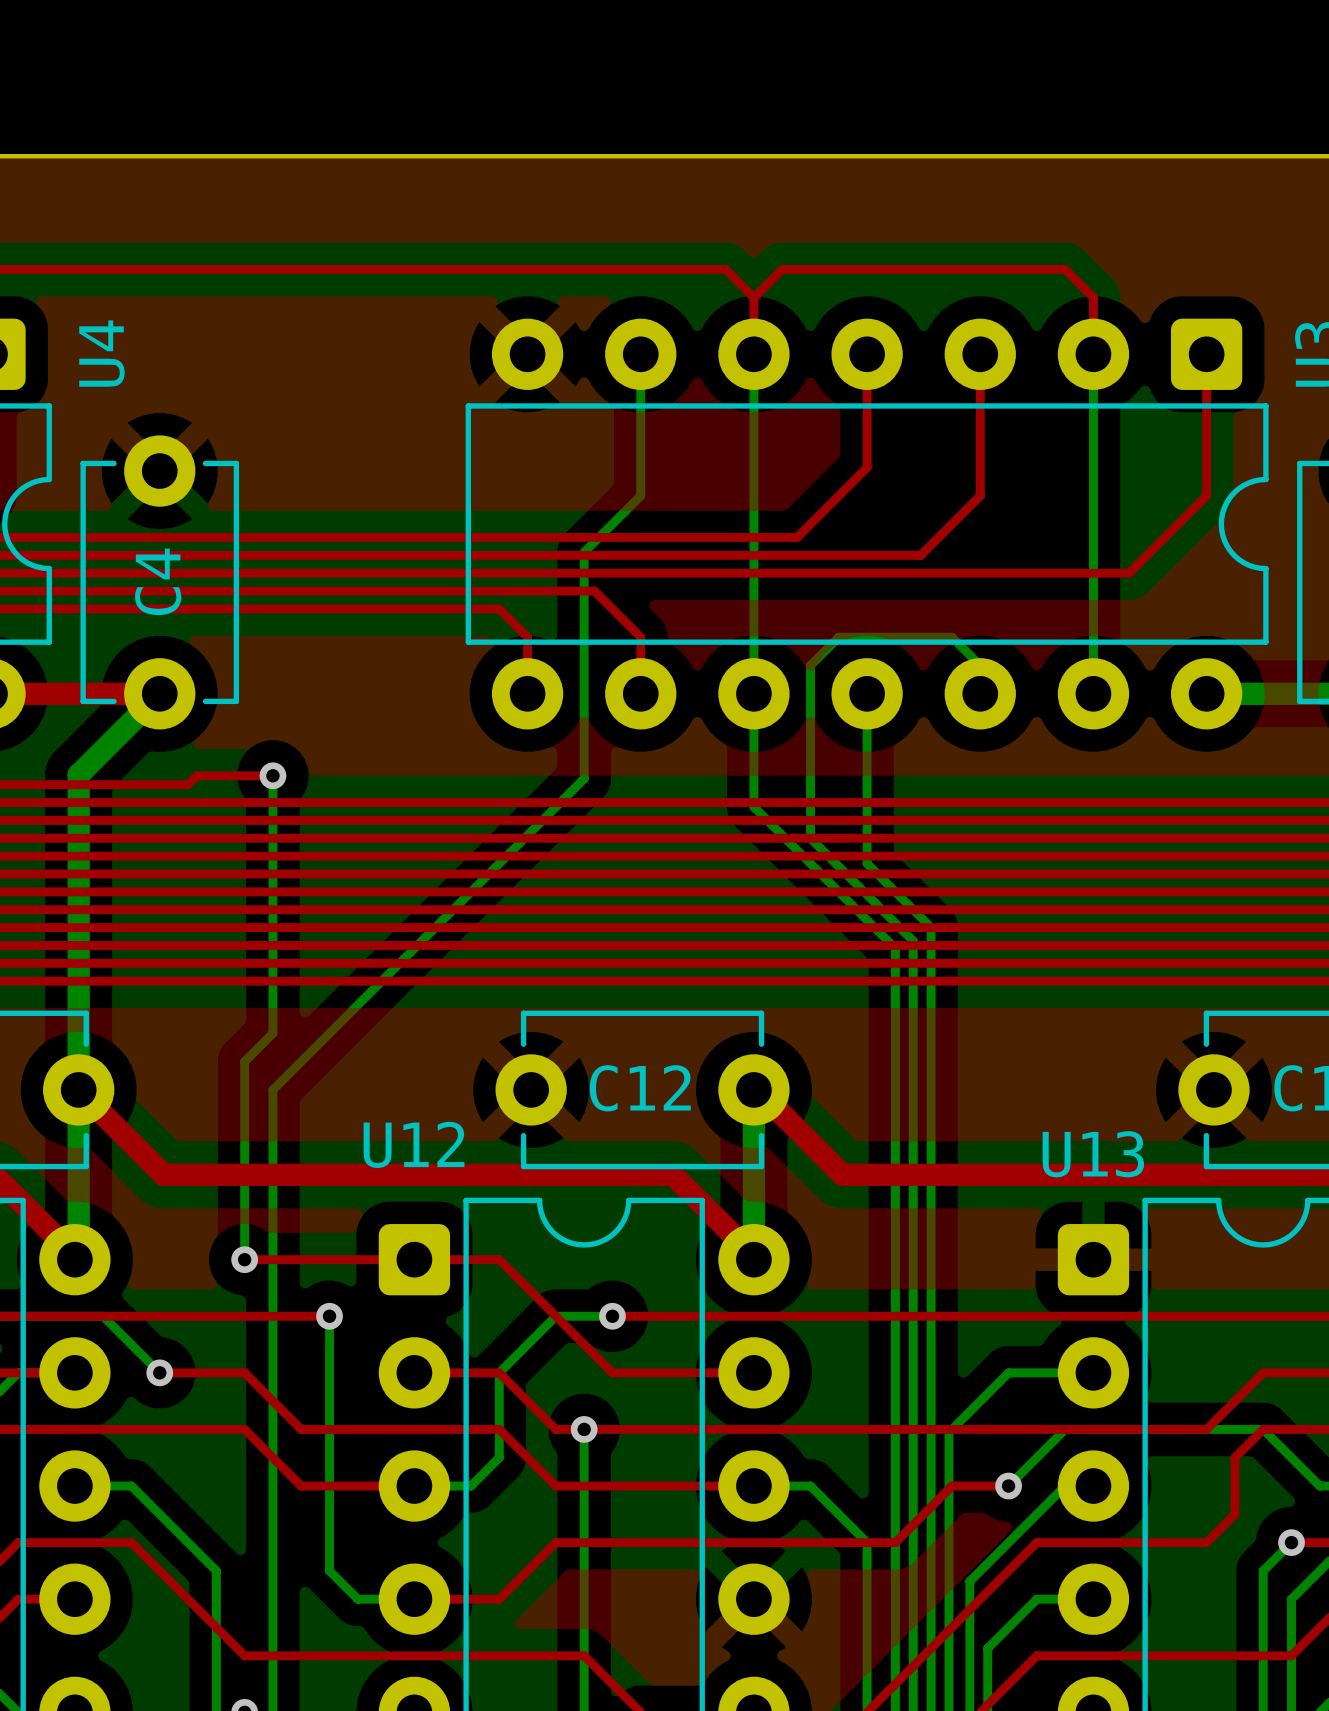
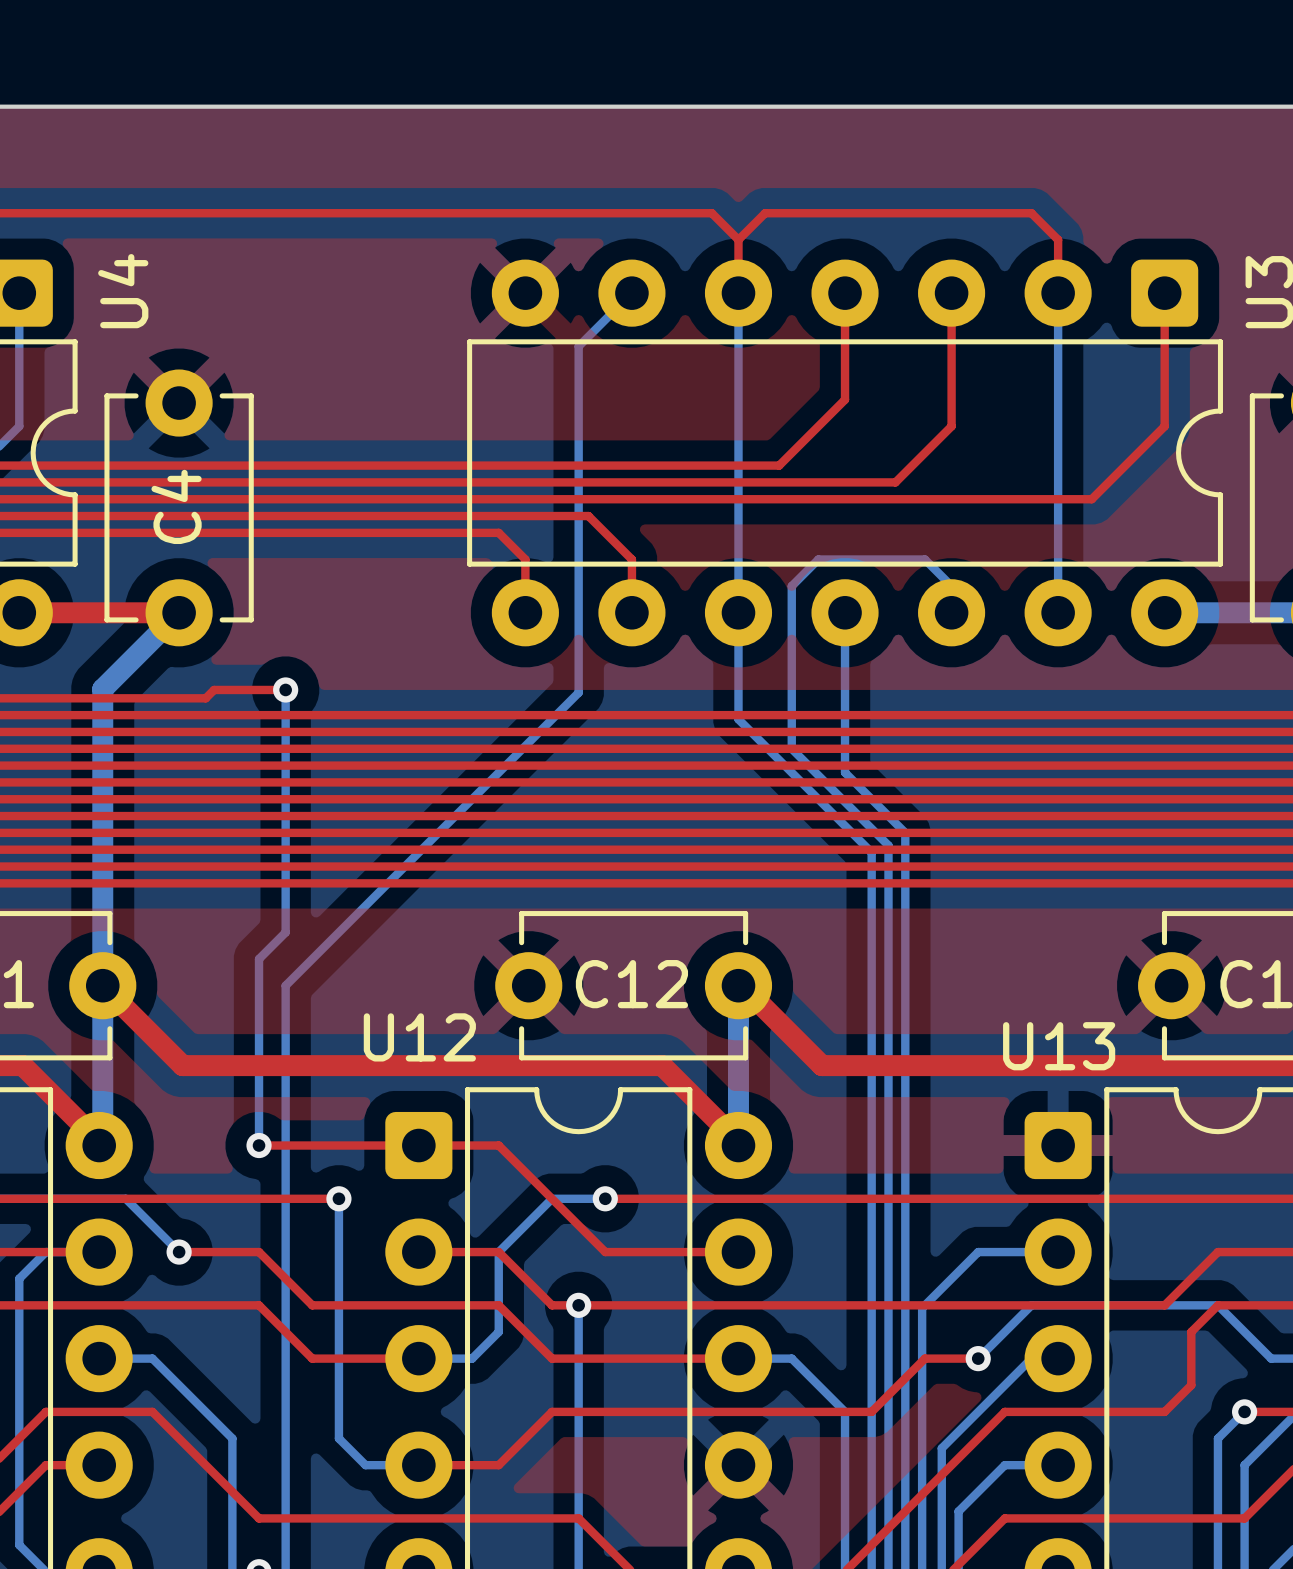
bottom track: (640, 354) (640, 495) (584, 552) -> (631, 293) (578, 346) (578, 479)

